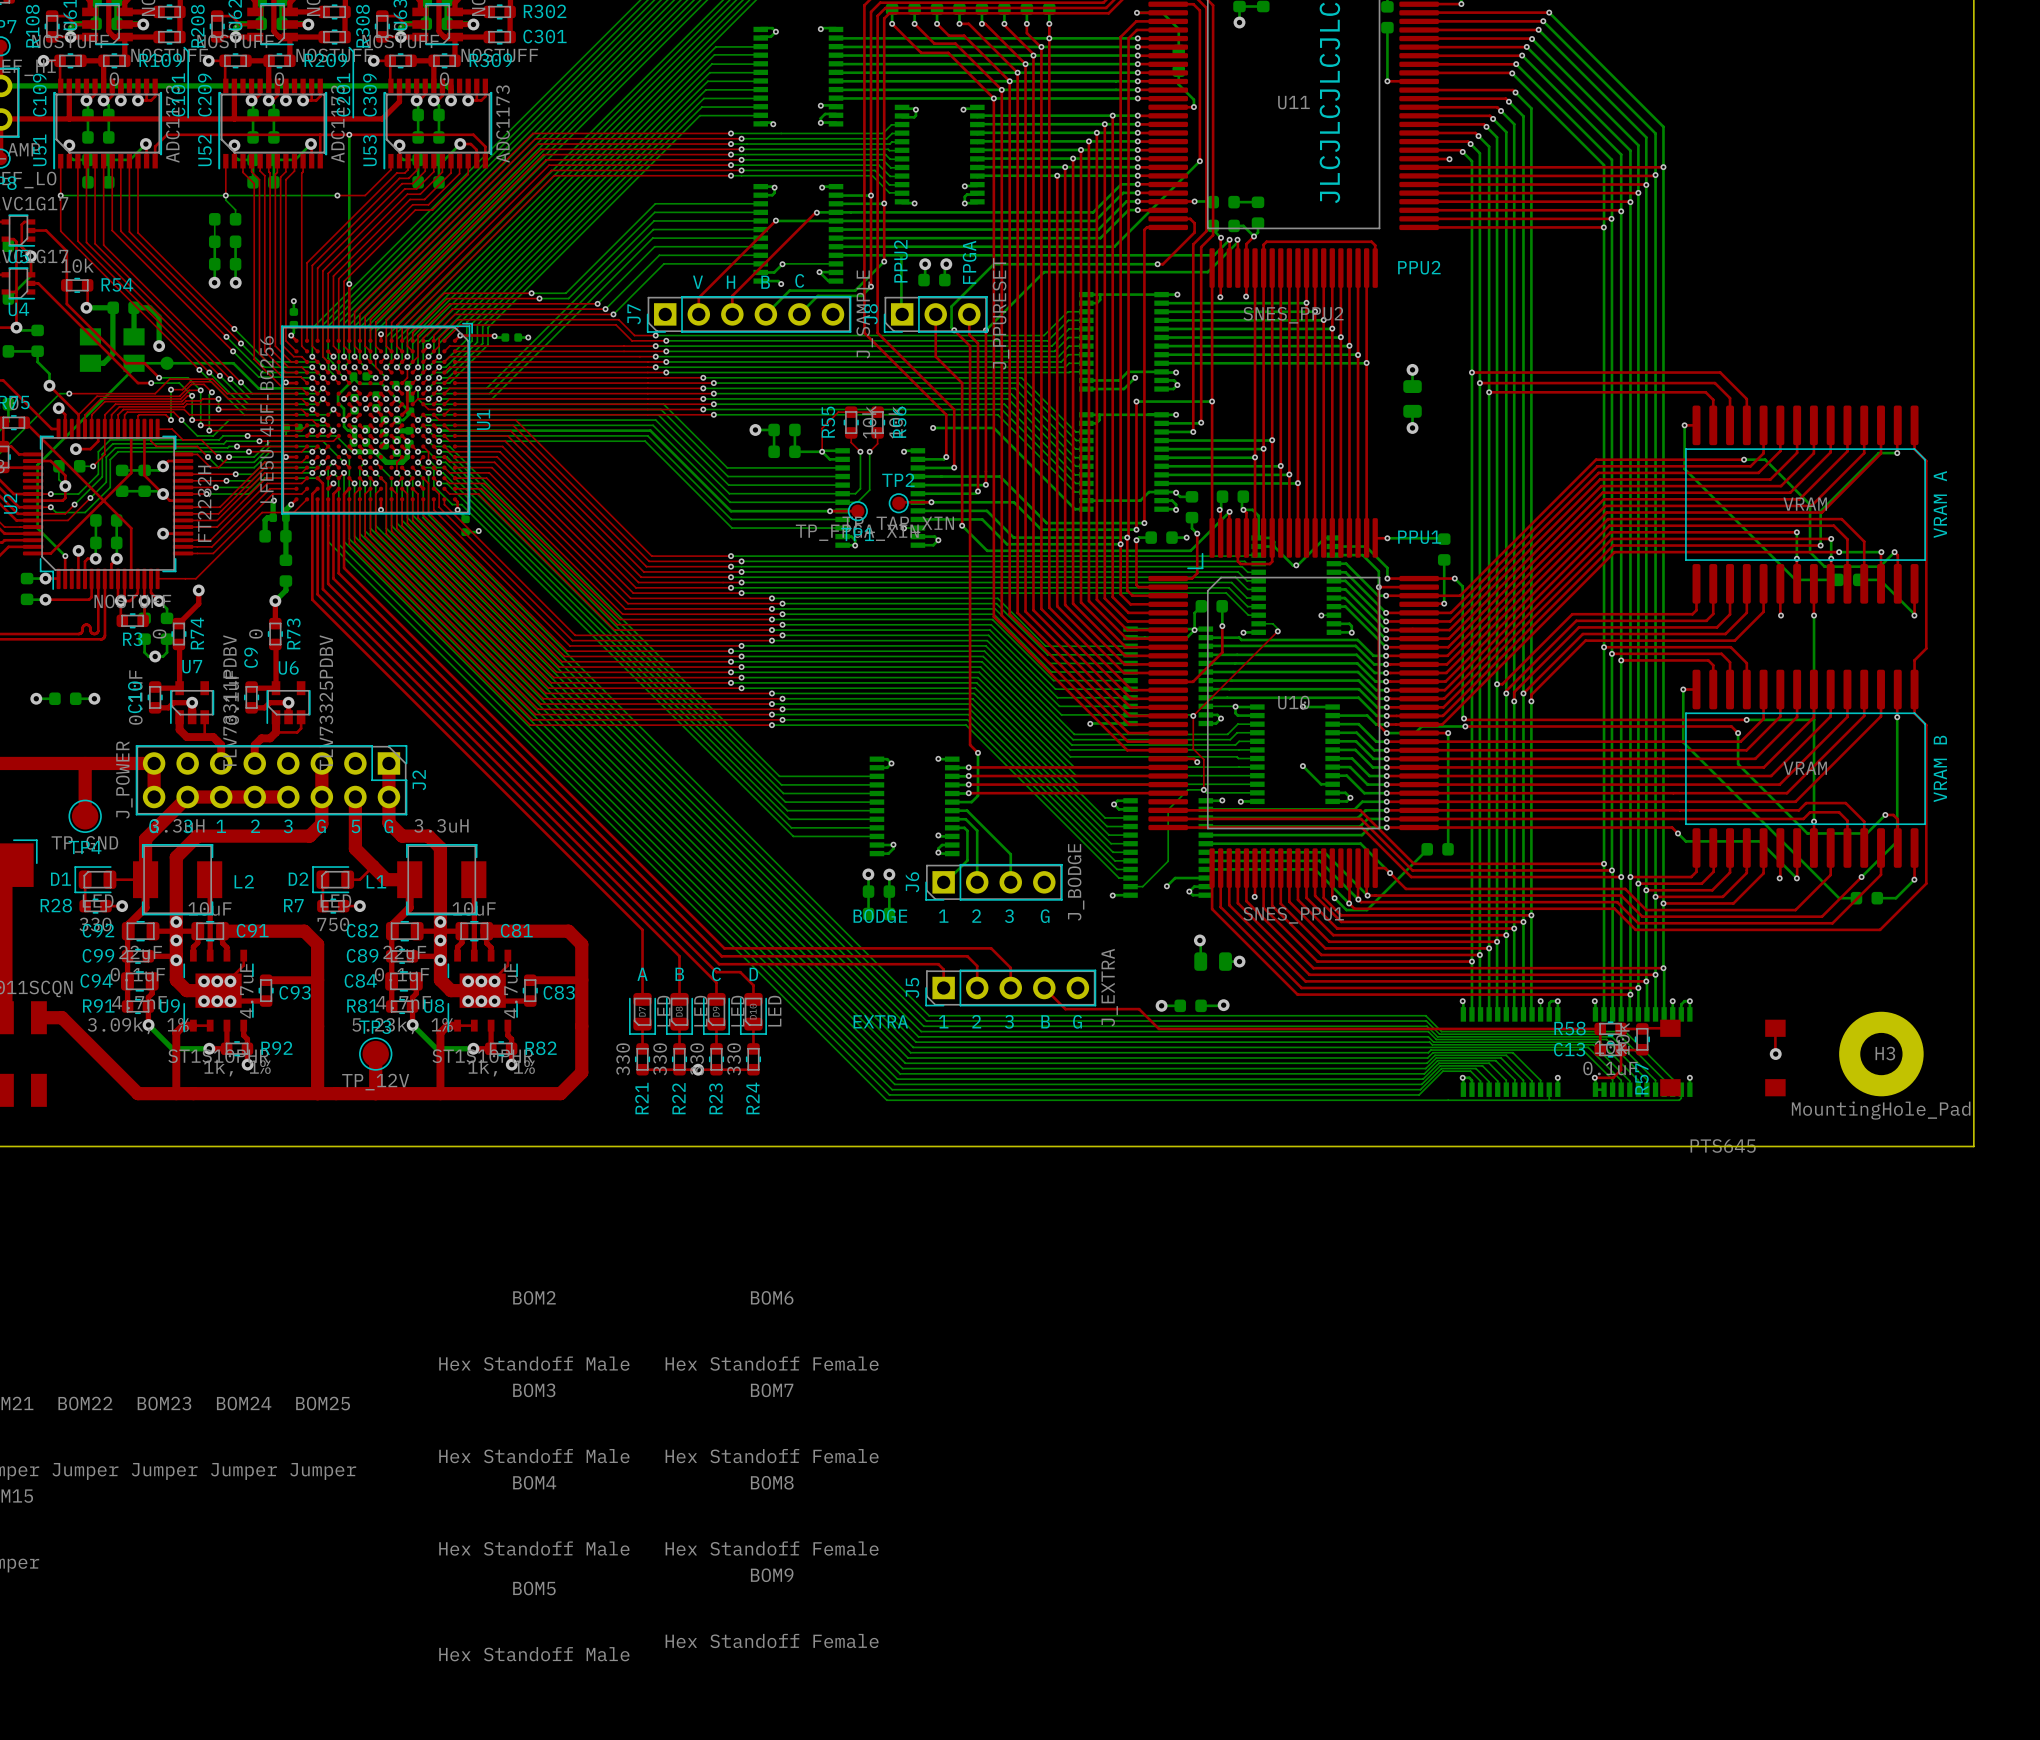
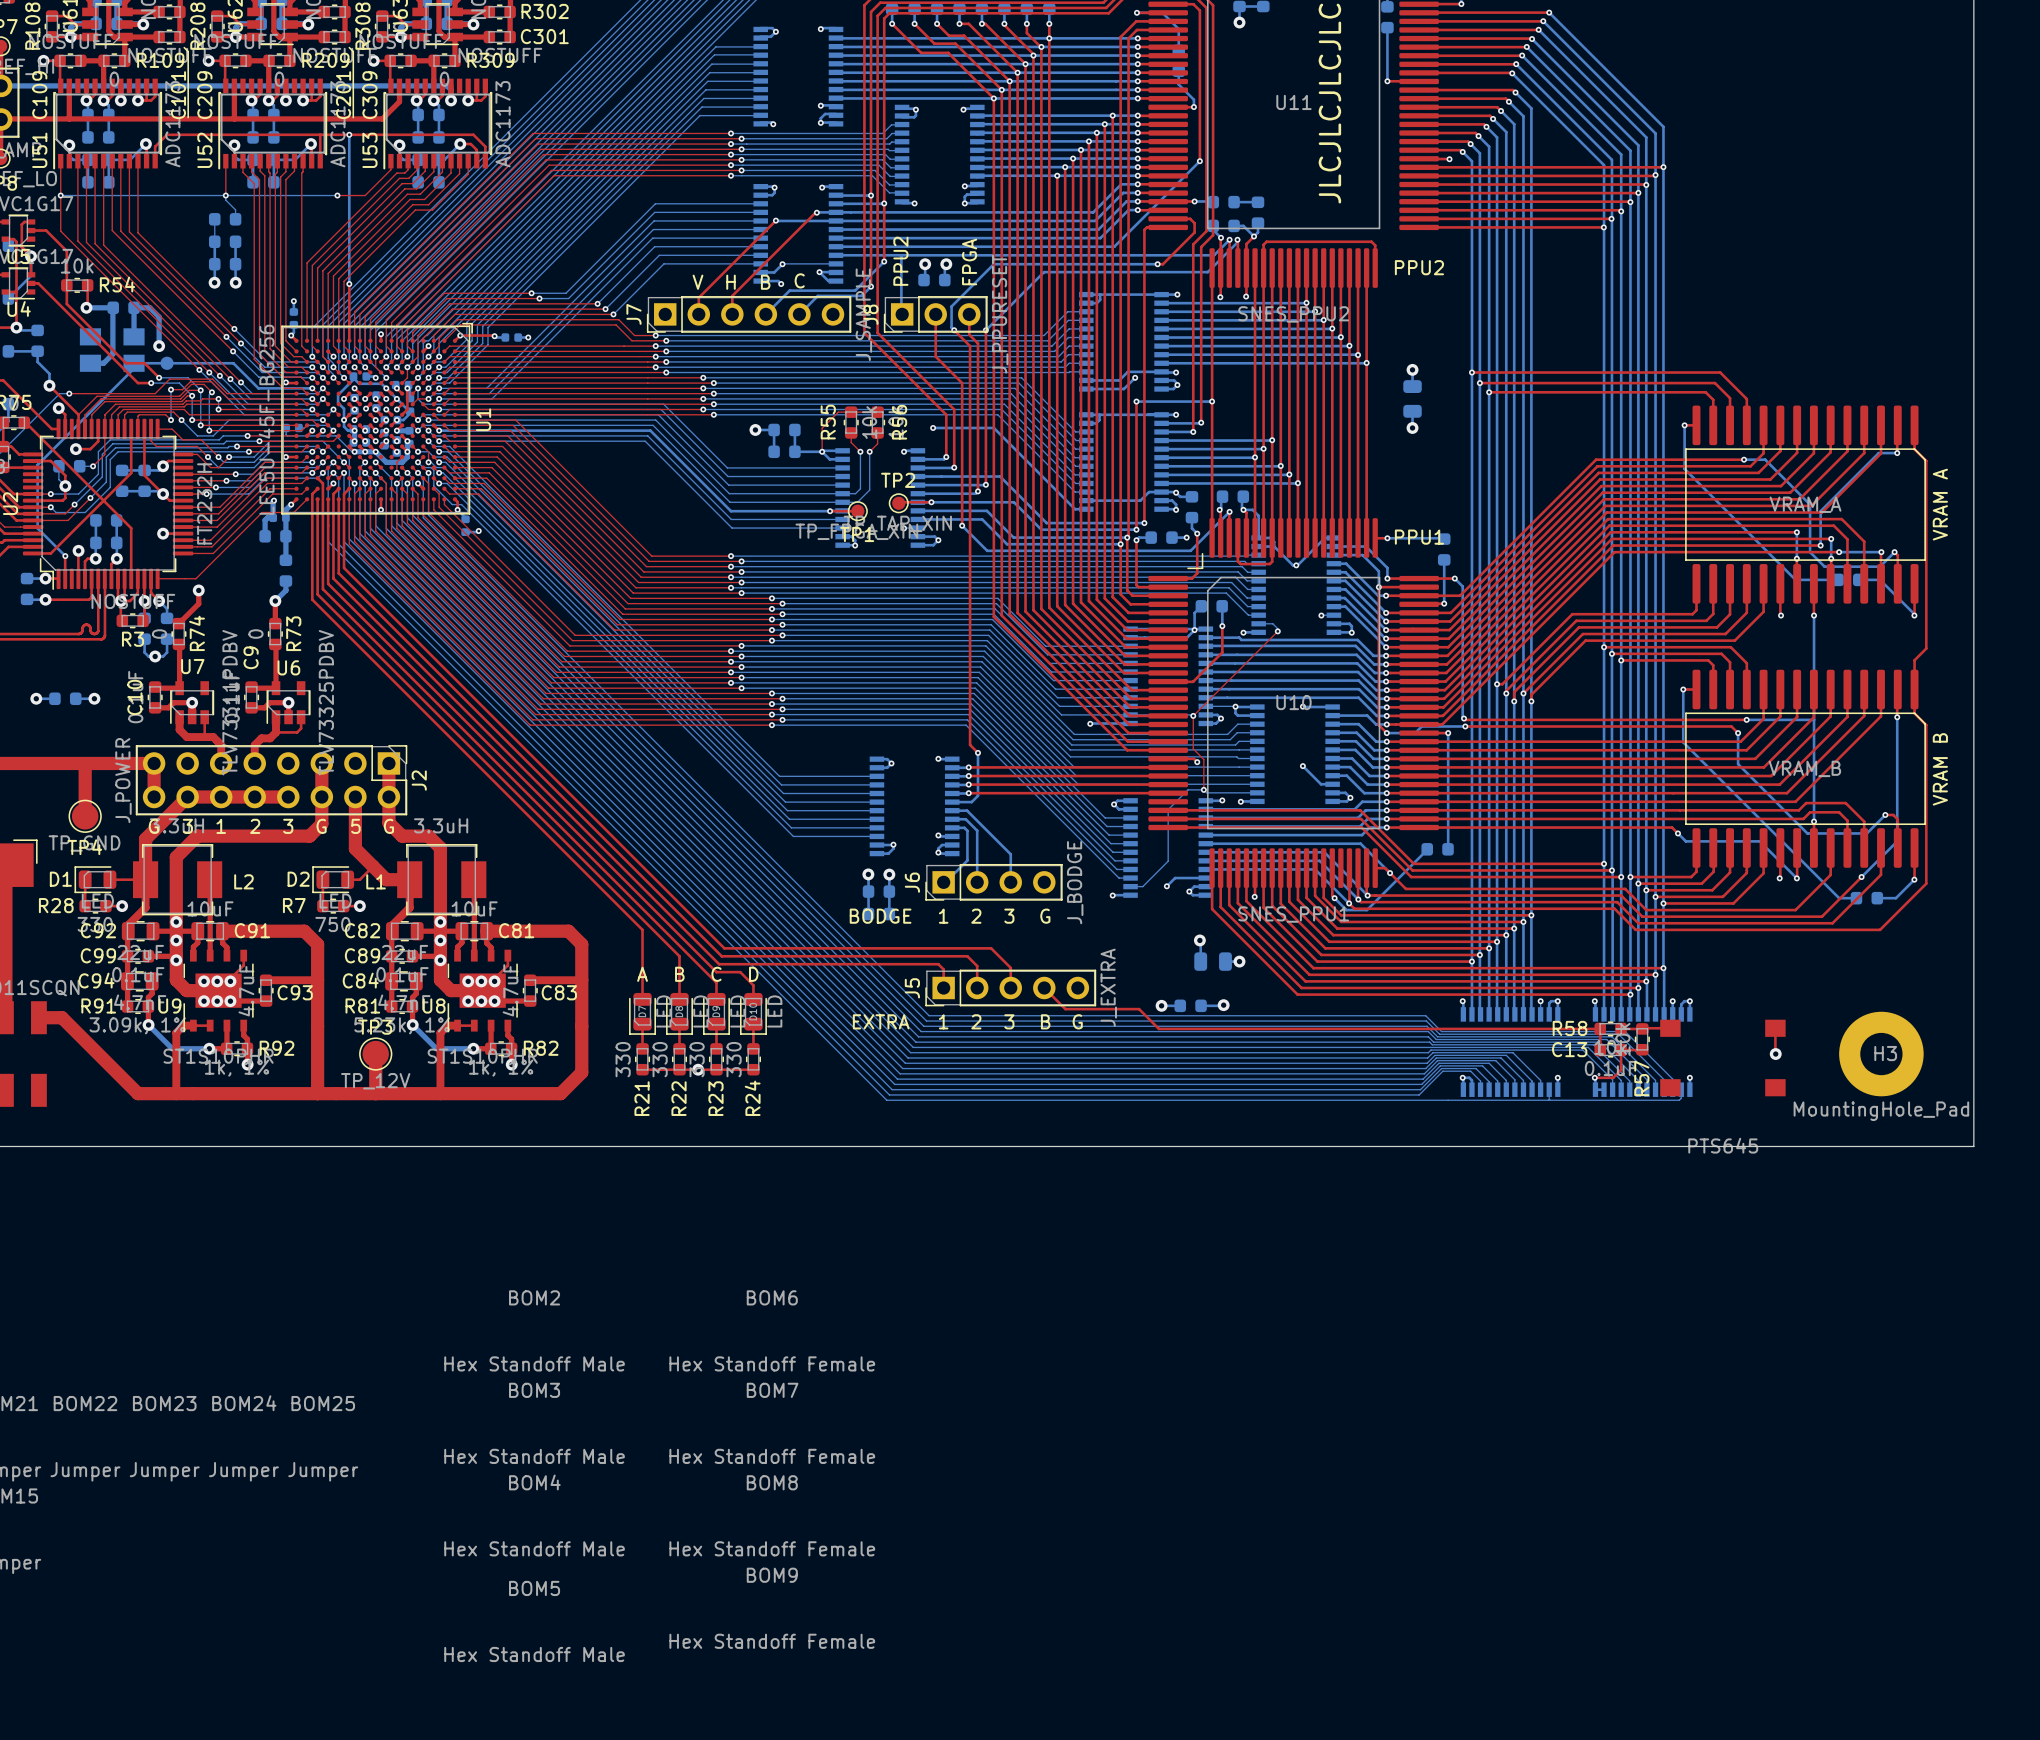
part value: VRAM (1805, 504) -> VRAM_A (1805, 504)
part value: VRAM (1805, 768) -> VRAM_B (1804, 768)

